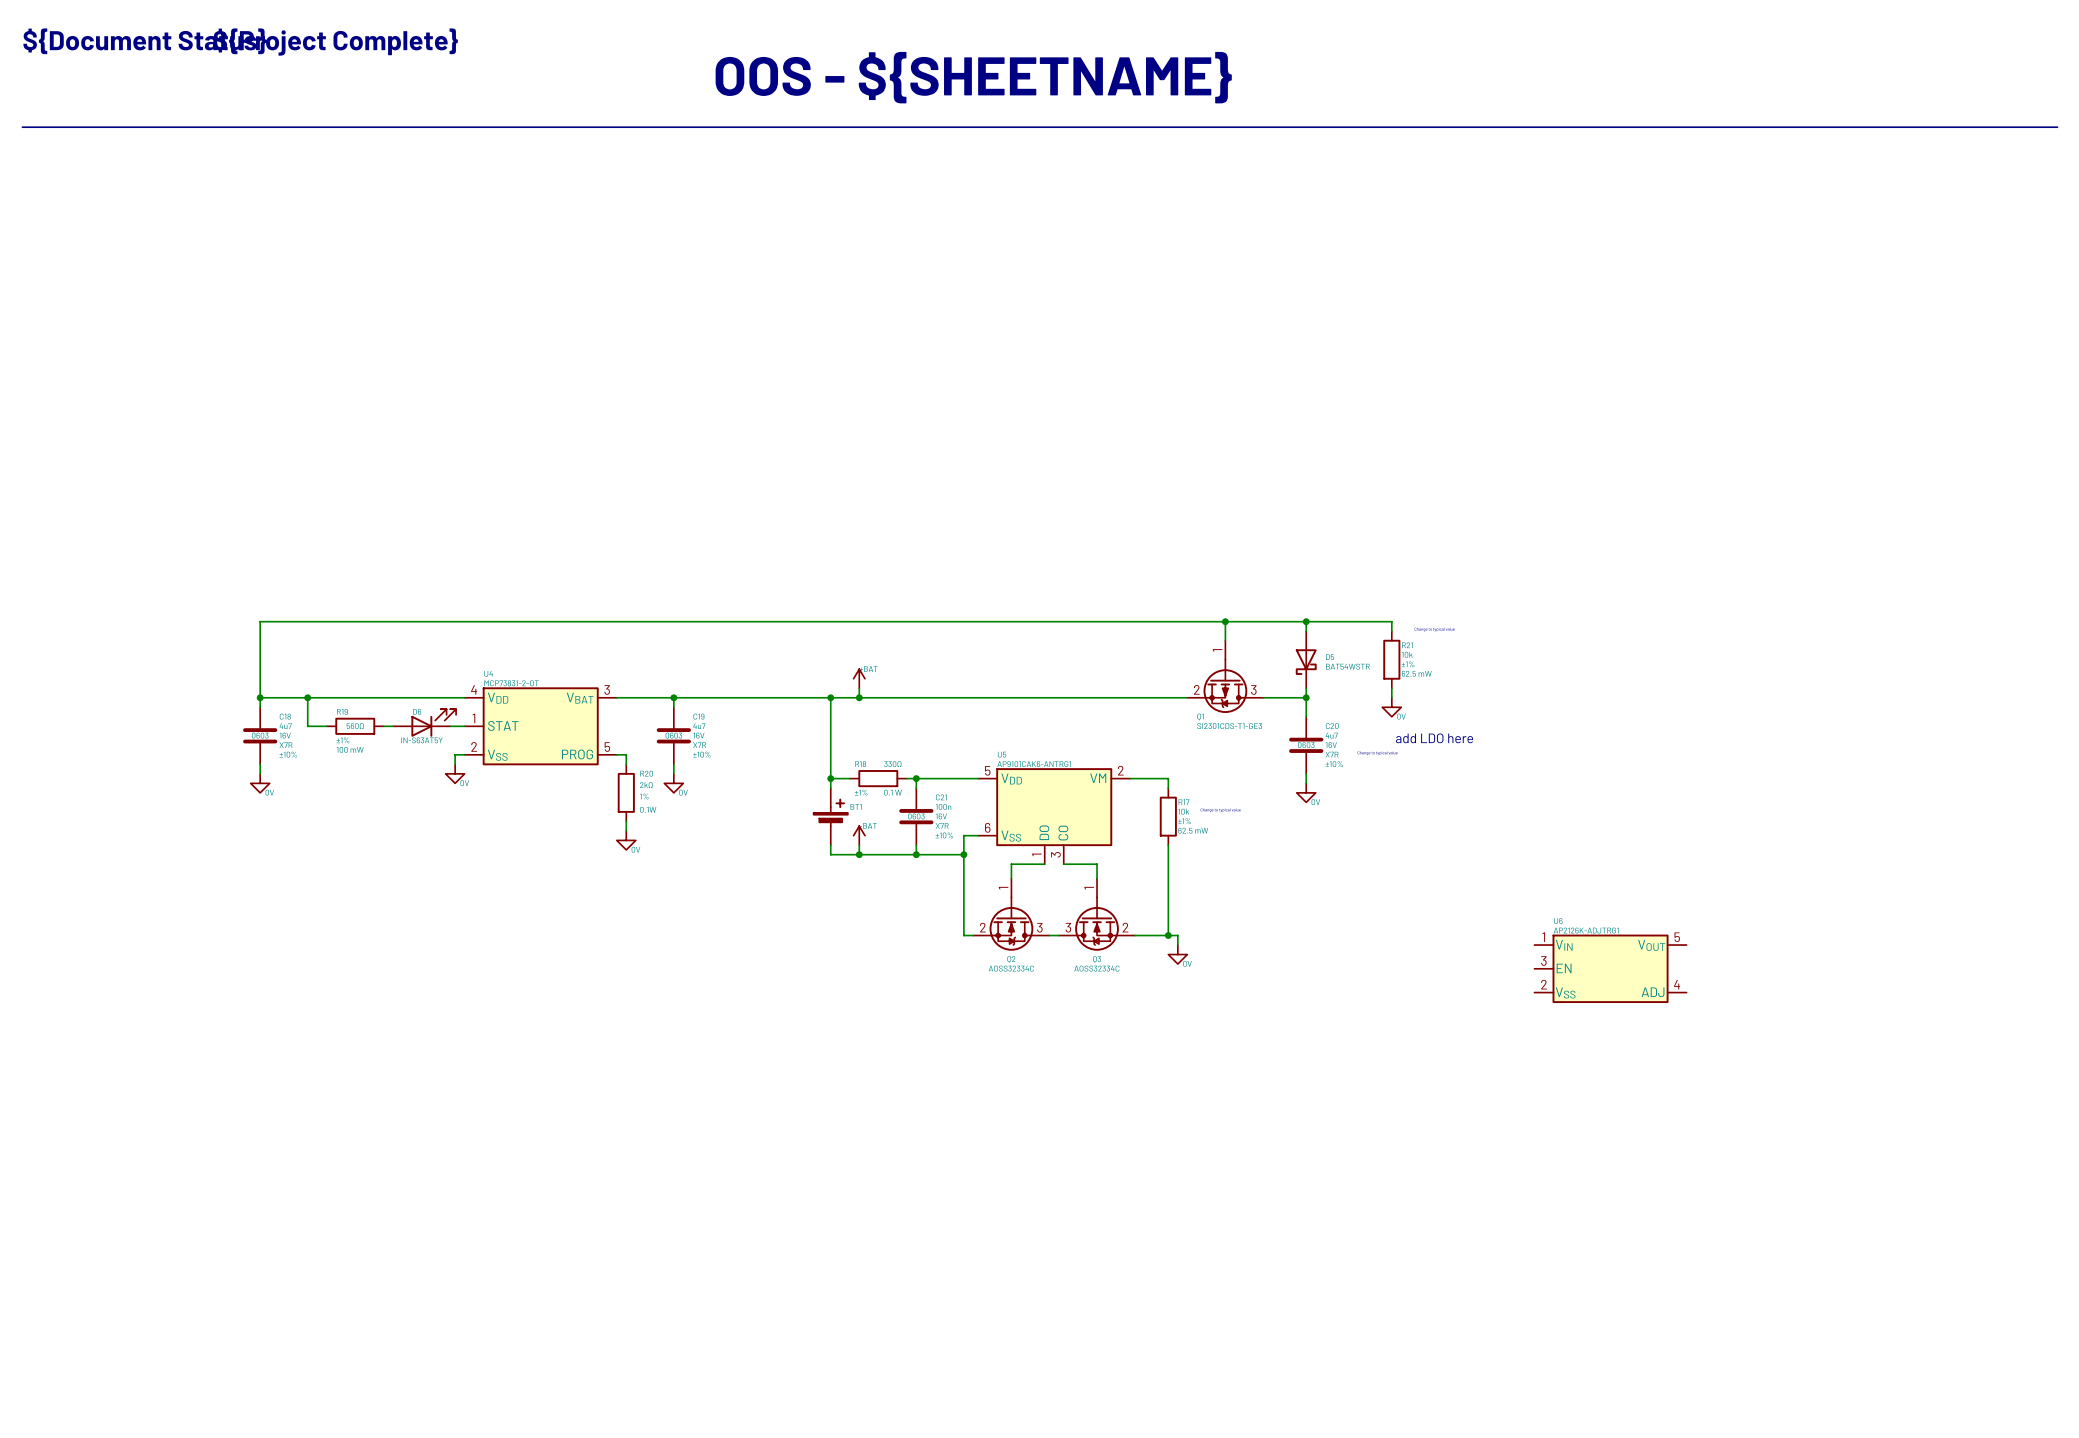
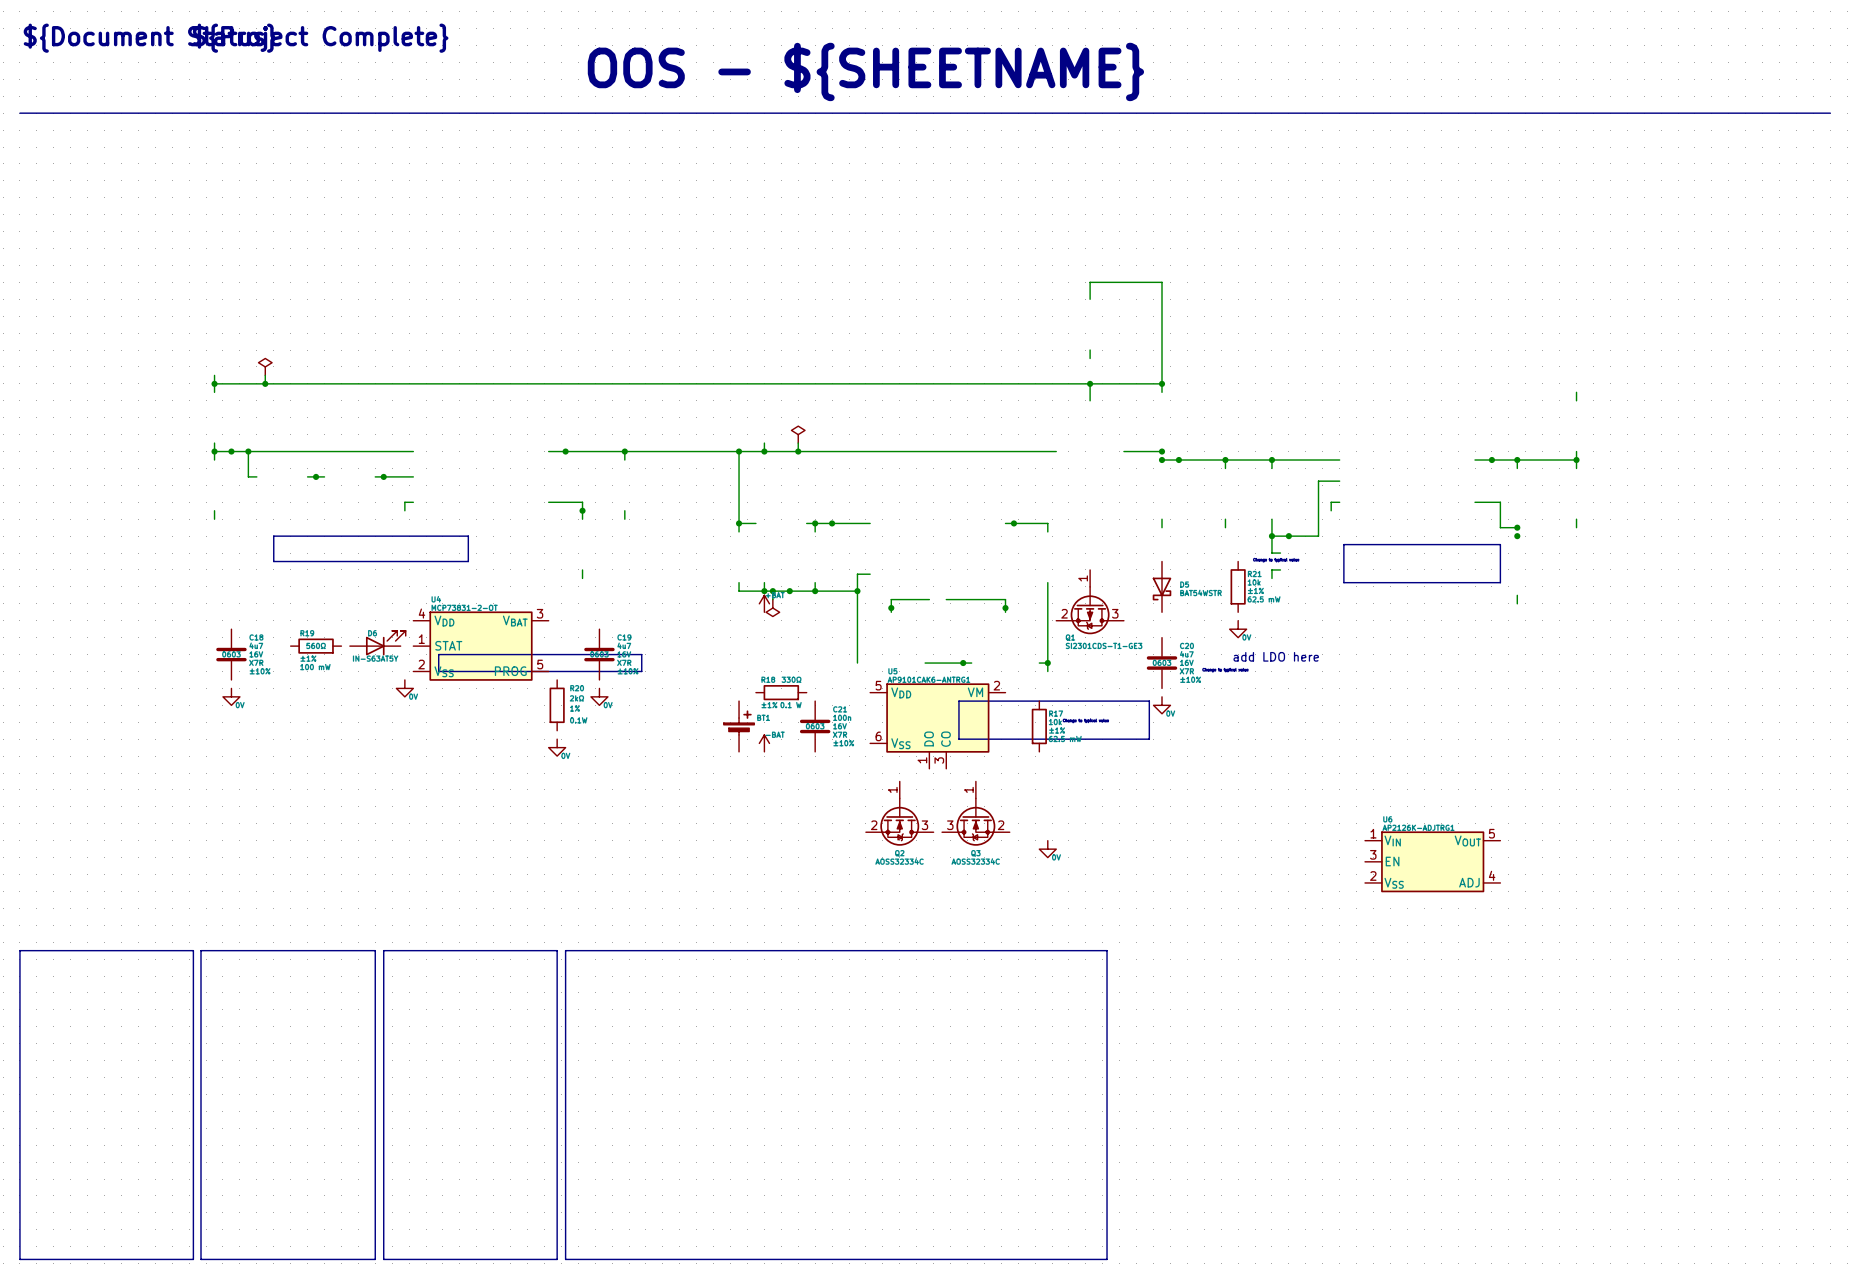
wire: none -> (1090, 299) (1090, 282) (1162, 282) (1162, 392)
wire: none -> (1090, 350) (1090, 358)
power symbol: none -> (265, 366)
wire: none -> (214, 375) (214, 392)
wire: none -> (265, 375) (265, 383)
wire: none -> (214, 383) (1162, 383)
junction: none -> (214, 383)
junction: none -> (265, 383)
wire: none -> (1090, 383) (1090, 400)
junction: none -> (1090, 383)
junction: none -> (1162, 383)
wire: none -> (1576, 392) (1576, 400)
power symbol: none -> (798, 434)
wire: none -> (214, 443) (214, 460)
wire: none -> (764, 443) (764, 451)
wire: none -> (798, 443) (798, 451)
wire: none -> (214, 451) (413, 451)
junction: none -> (214, 451)
junction: none -> (231, 451)
wire: none -> (248, 451) (248, 476) (256, 476)
junction: none -> (248, 451)
wire: none -> (548, 451) (1056, 451)
junction: none -> (565, 451)
wire: none -> (624, 451) (624, 460)
junction: none -> (624, 451)
wire: none -> (739, 451) (739, 531)
junction: none -> (739, 451)
junction: none -> (764, 451)
junction: none -> (798, 451)
wire: none -> (1123, 451) (1162, 451)
junction: none -> (1162, 451)
wire: none -> (1576, 451) (1576, 468)
wire: none -> (1162, 460) (1339, 460)
junction: none -> (1162, 460)
junction: none -> (1178, 460)
wire: none -> (1225, 460) (1225, 468)
junction: none -> (1225, 460)
wire: none -> (1271, 460) (1271, 468)
junction: none -> (1271, 460)
wire: none -> (1475, 460) (1576, 460)
junction: none -> (1491, 460)
wire: none -> (1517, 460) (1517, 468)
junction: none -> (1517, 460)
junction: none -> (1576, 460)
wire: none -> (307, 476) (324, 476)
junction: none -> (316, 476)
wire: none -> (375, 476) (413, 476)
junction: none -> (383, 476)
wire: none -> (1339, 481) (1318, 481) (1318, 536) (1271, 536)
wire: none -> (413, 502) (404, 502) (404, 510)
wire: none -> (548, 502) (582, 502) (582, 519)
wire: none -> (1339, 502) (1331, 502) (1331, 510)
wire: none -> (1475, 502) (1500, 502) (1500, 527) (1517, 527)
wire: none -> (214, 510) (214, 519)
junction: none -> (582, 510)
wire: none -> (624, 510) (624, 519)
wire: none -> (1271, 519) (1271, 553) (1280, 553)
wire: none -> (1576, 519) (1576, 527)
wire: none -> (739, 523) (755, 523)
junction: none -> (739, 523)
wire: none -> (806, 523) (870, 523)
wire: none -> (815, 523) (815, 531)
junction: none -> (815, 523)
junction: none -> (832, 523)
wire: none -> (1005, 523) (1047, 523) (1047, 531)
junction: none -> (1013, 523)
junction: none -> (1517, 527)
line: none -> (273, 536) (468, 536) (468, 561) (273, 561) (273, 536)
junction: none -> (1271, 536)
junction: none -> (1288, 536)
junction: none -> (1517, 536)
line: none -> (1343, 544) (1500, 544) (1500, 582) (1343, 582) (1343, 544)
wire: (1225, 621) (1225, 640) -> none
junction: (1225, 621) -> none
wire: (1306, 621) (1306, 631) -> (1162, 519) (1162, 527)
junction: (1306, 621) -> none
wire: (1391, 631) (1391, 621) (260, 621) (260, 707) -> none
wire: none -> (1280, 569) (1271, 569) (1271, 578)
wire: none -> (870, 574) (857, 574) (857, 663)
wire: none -> (739, 582) (739, 591) (857, 591)
wire: none -> (764, 582) (764, 591)
wire: none -> (1047, 582) (1047, 671)
junction: none -> (764, 591)
junction: none -> (772, 591)
junction: none -> (789, 591)
junction: none -> (815, 591)
junction: none -> (857, 591)
wire: none -> (1517, 595) (1517, 603)
wire: none -> (929, 599) (891, 599) (891, 612)
wire: none -> (946, 599) (1005, 599) (1005, 612)
power symbol: none -> (772, 608)
junction: none -> (891, 608)
junction: none -> (1005, 608)
wire: (1306, 688) (1306, 716) -> none
wire: (1391, 688) (1391, 697) -> (1225, 519) (1225, 527)
wire: (260, 697) (464, 697) -> none
junction: (260, 697) -> none
wire: (307, 697) (307, 726) (326, 726) -> none
junction: (307, 697) -> none
wire: (616, 697) (1187, 697) -> none
wire: (673, 697) (673, 707) -> (582, 569) (582, 578)
junction: (673, 697) -> none
wire: (830, 697) (830, 788) -> none
junction: (830, 697) -> none
junction: (859, 697) -> none
wire: (1263, 697) (1306, 697) -> none
junction: (1306, 697) -> none
wire: (383, 726) (393, 726) -> none
wire: (450, 726) (464, 726) -> none
line: none -> (438, 654) (641, 654) (641, 671) (438, 671) (438, 654)
wire: none -> (925, 663) (971, 663)
junction: none -> (963, 663)
wire: none -> (1039, 663) (1047, 663)
junction: none -> (1047, 663)
wire: (464, 754) (455, 754) (455, 764) -> none
wire: (616, 754) (626, 754) (626, 764) -> none
wire: (260, 764) (260, 773) -> none
wire: (673, 764) (673, 773) -> none
wire: (1306, 773) (1306, 783) -> none
wire: (830, 778) (849, 778) -> none
junction: (830, 778) -> none
wire: (906, 778) (978, 778) -> none
wire: (916, 778) (916, 788) -> (815, 582) (815, 591)
junction: (916, 778) -> none
wire: (1130, 778) (1168, 778) (1168, 788) -> none
line: none -> (958, 701) (1149, 701) (1149, 739) (958, 739) (958, 701)
wire: (626, 821) (626, 830) -> none
wire: (978, 835) (963, 835) (963, 935) (973, 935) -> none
wire: (830, 845) (830, 854) (963, 854) -> none
wire: (859, 845) (859, 854) -> none
wire: (916, 845) (916, 854) -> none
wire: (1168, 845) (1168, 935) -> none
junction: (859, 854) -> none
junction: (916, 854) -> none
junction: (963, 854) -> none
wire: (1044, 864) (1011, 864) (1011, 878) -> none
wire: (1063, 864) (1097, 864) (1097, 878) -> none
wire: (1049, 935) (1058, 935) -> none
wire: (1135, 935) (1177, 935) (1177, 945) -> none
junction: (1168, 935) -> none
line: none -> (19, 950) (193, 950) (193, 1259) (19, 1259) (19, 950)
line: none -> (201, 950) (375, 950) (375, 1259) (201, 1259) (201, 950)
line: none -> (383, 950) (557, 950) (557, 1259) (383, 1259) (383, 950)
line: none -> (565, 950) (1107, 950) (1107, 1259) (565, 1259) (565, 950)

